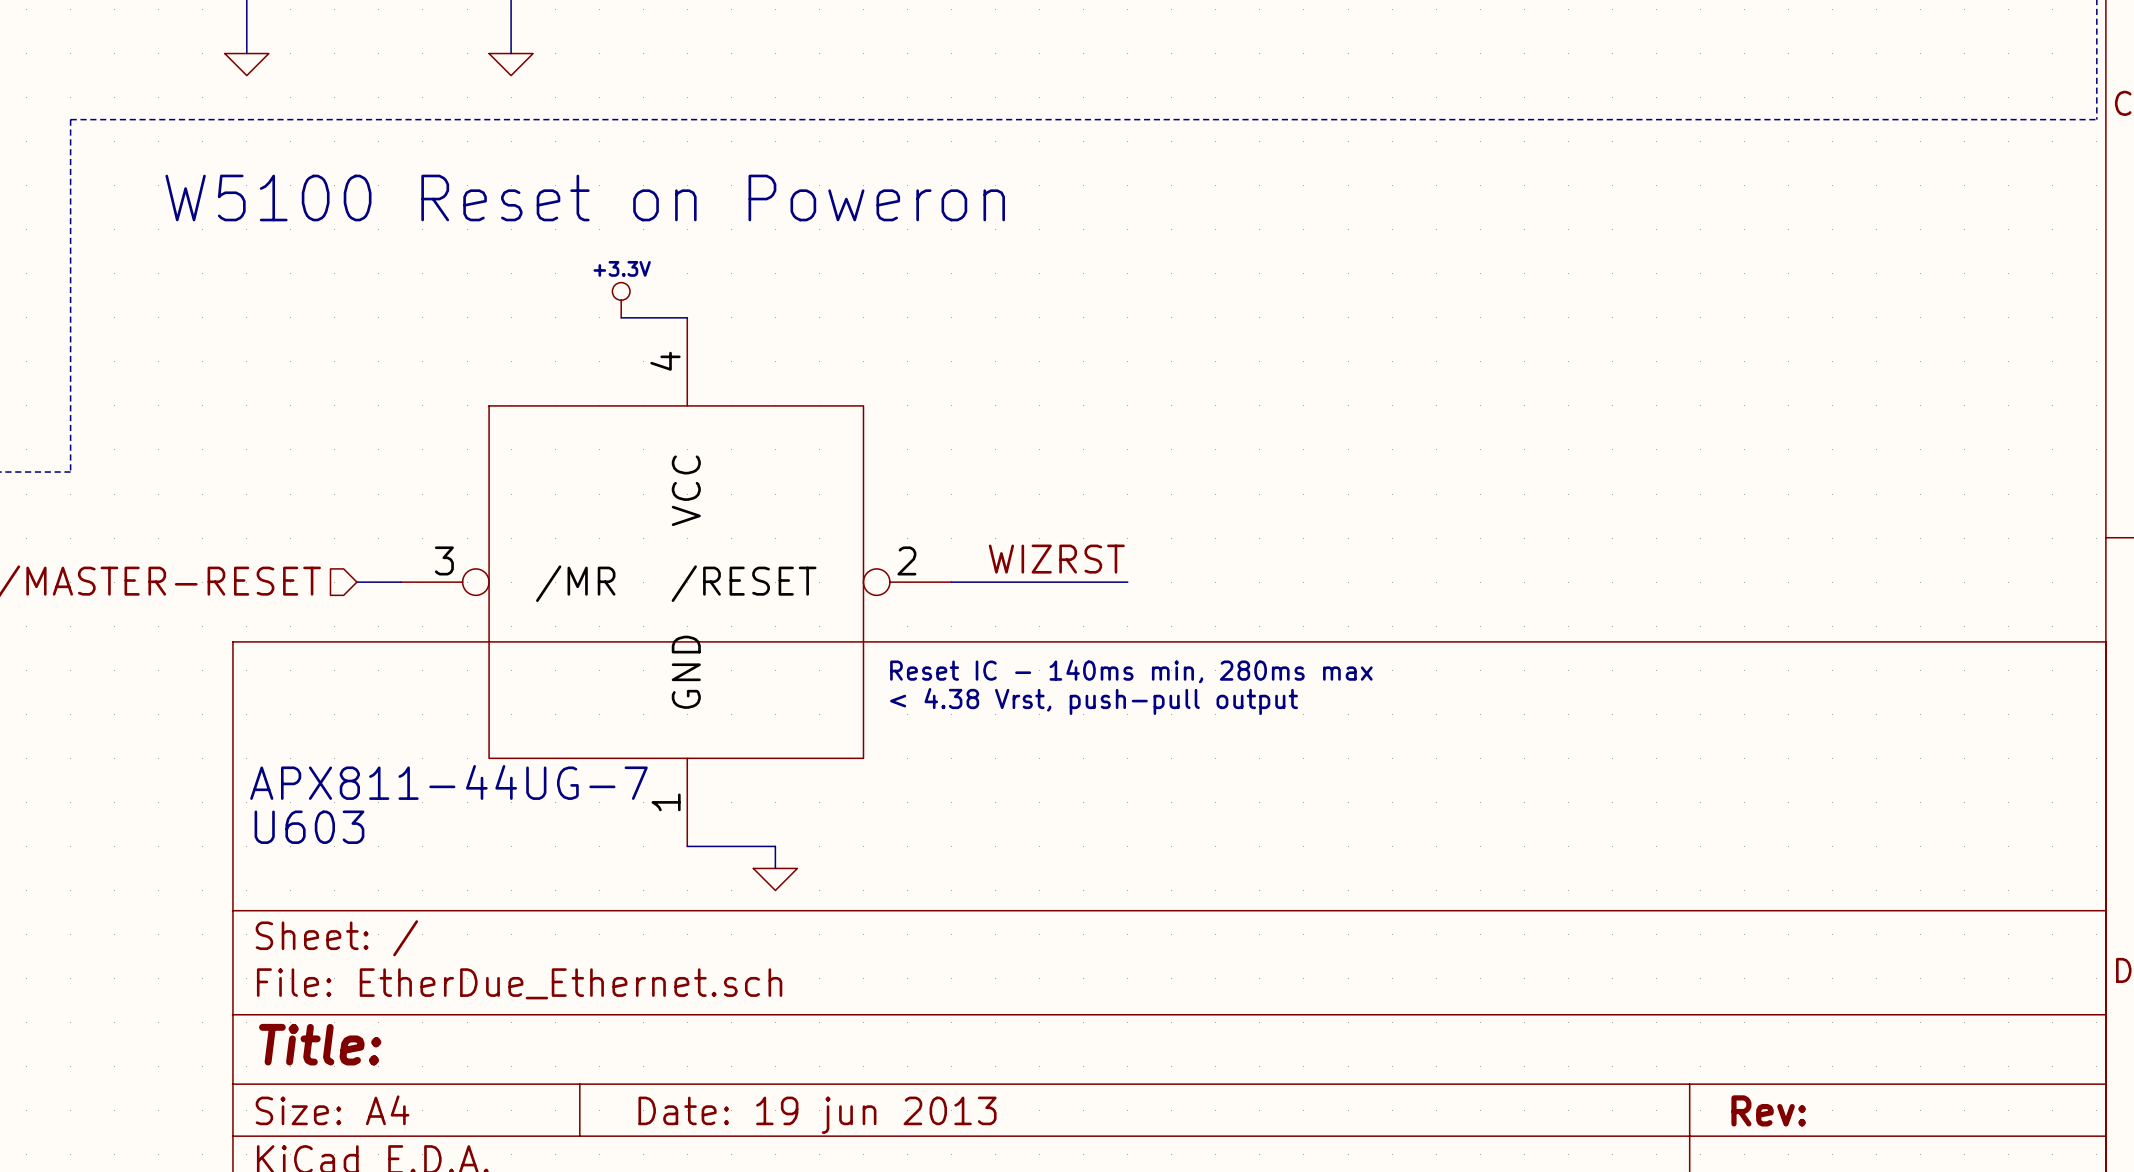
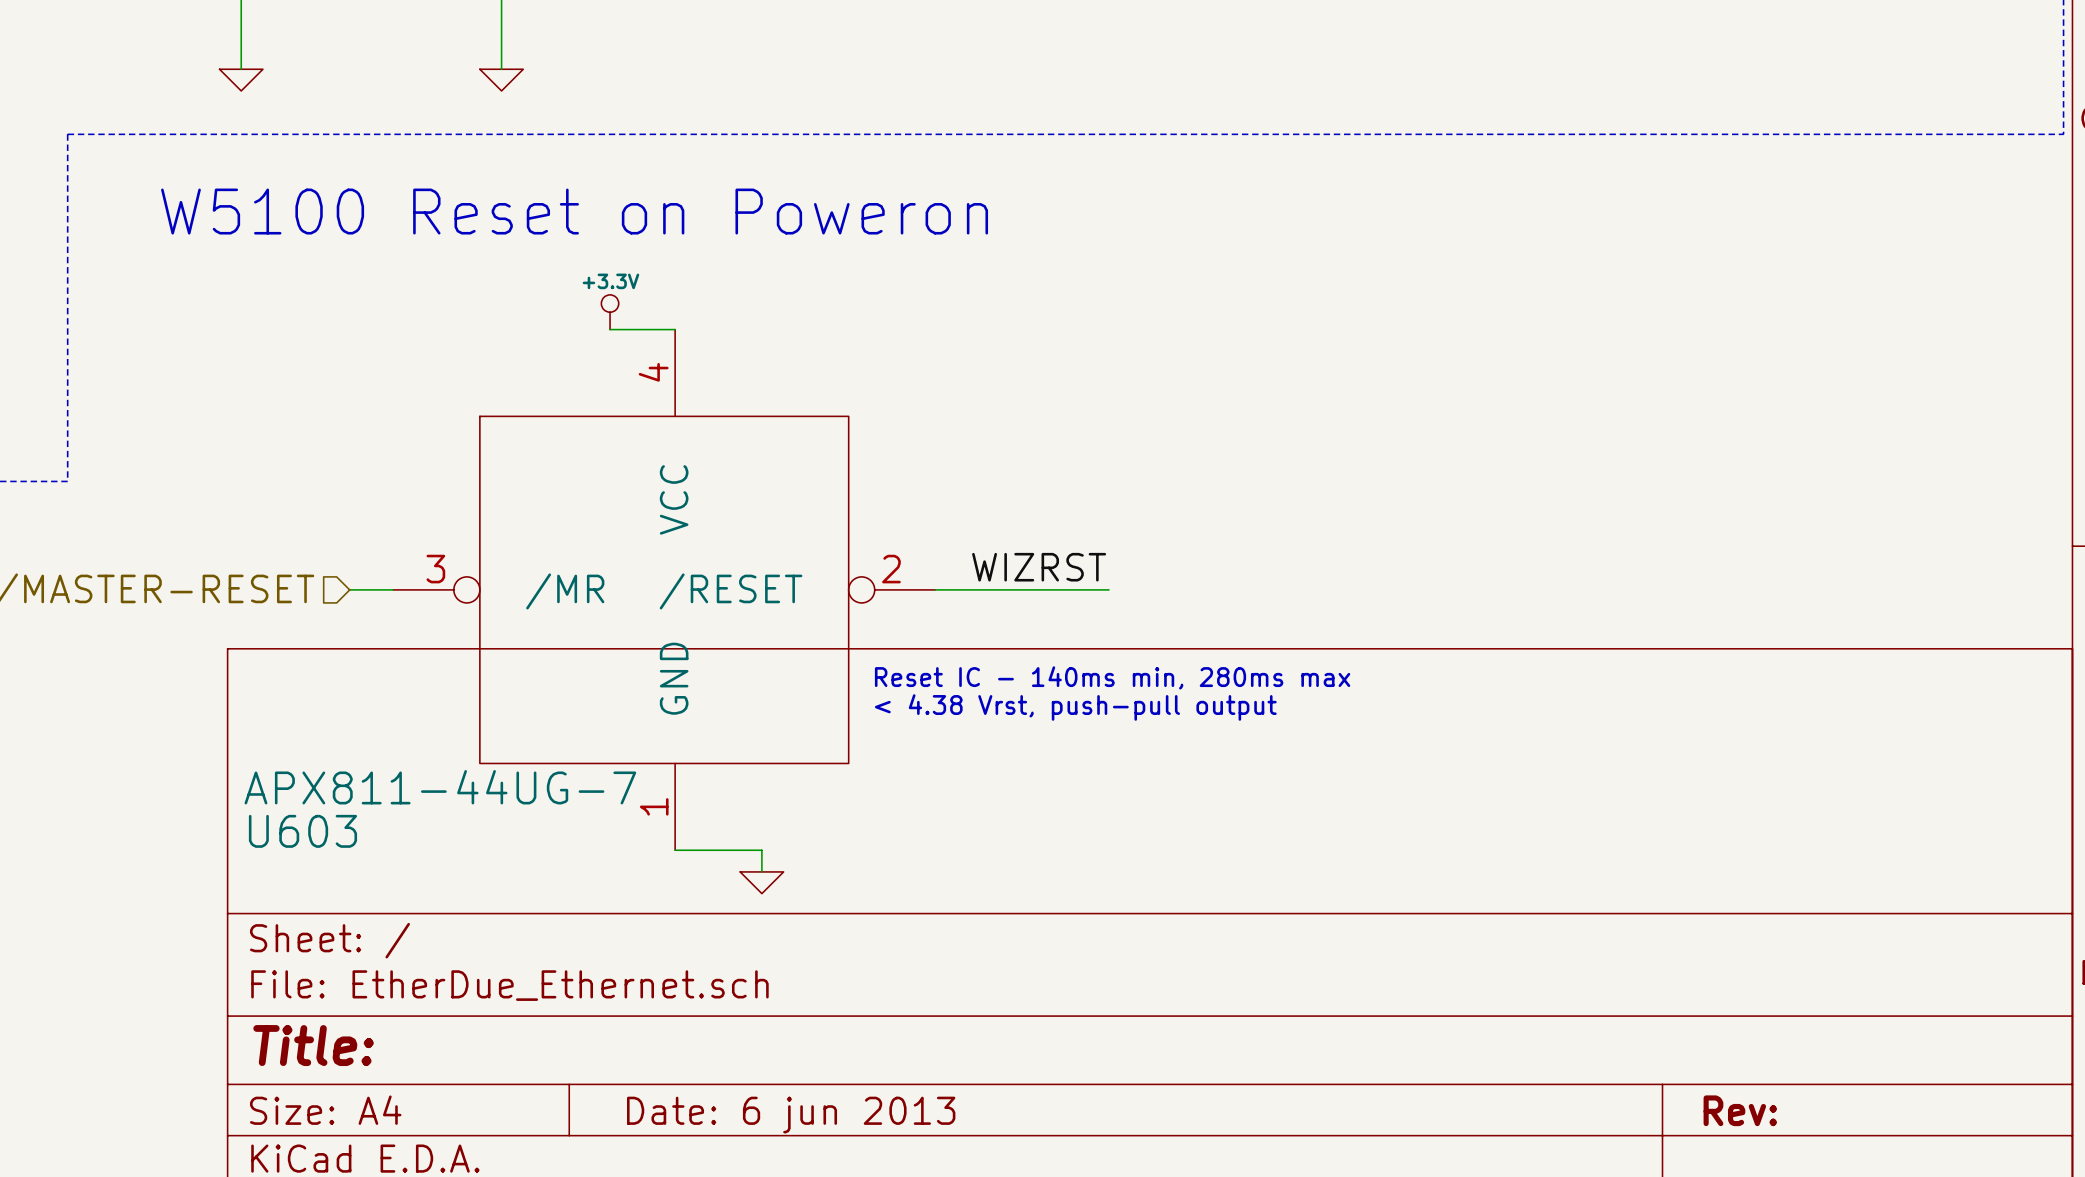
title block: Date: 19 jun 2013 (817, 1115) -> Date: 6 jun 2013 (791, 1115)

